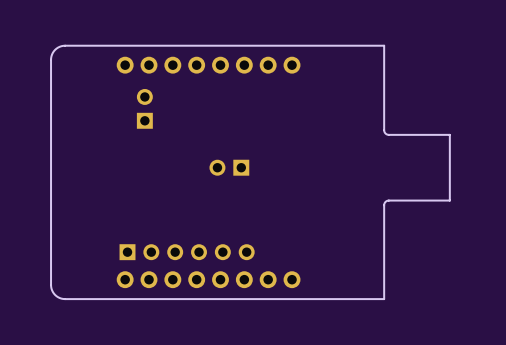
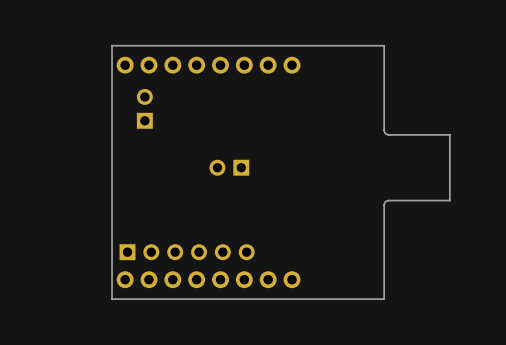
board edge: (112, 45) (61, 46) (53, 51) (51, 59) (51, 288) (56, 296) (63, 298) (112, 299) -> (112, 45) (112, 299)

